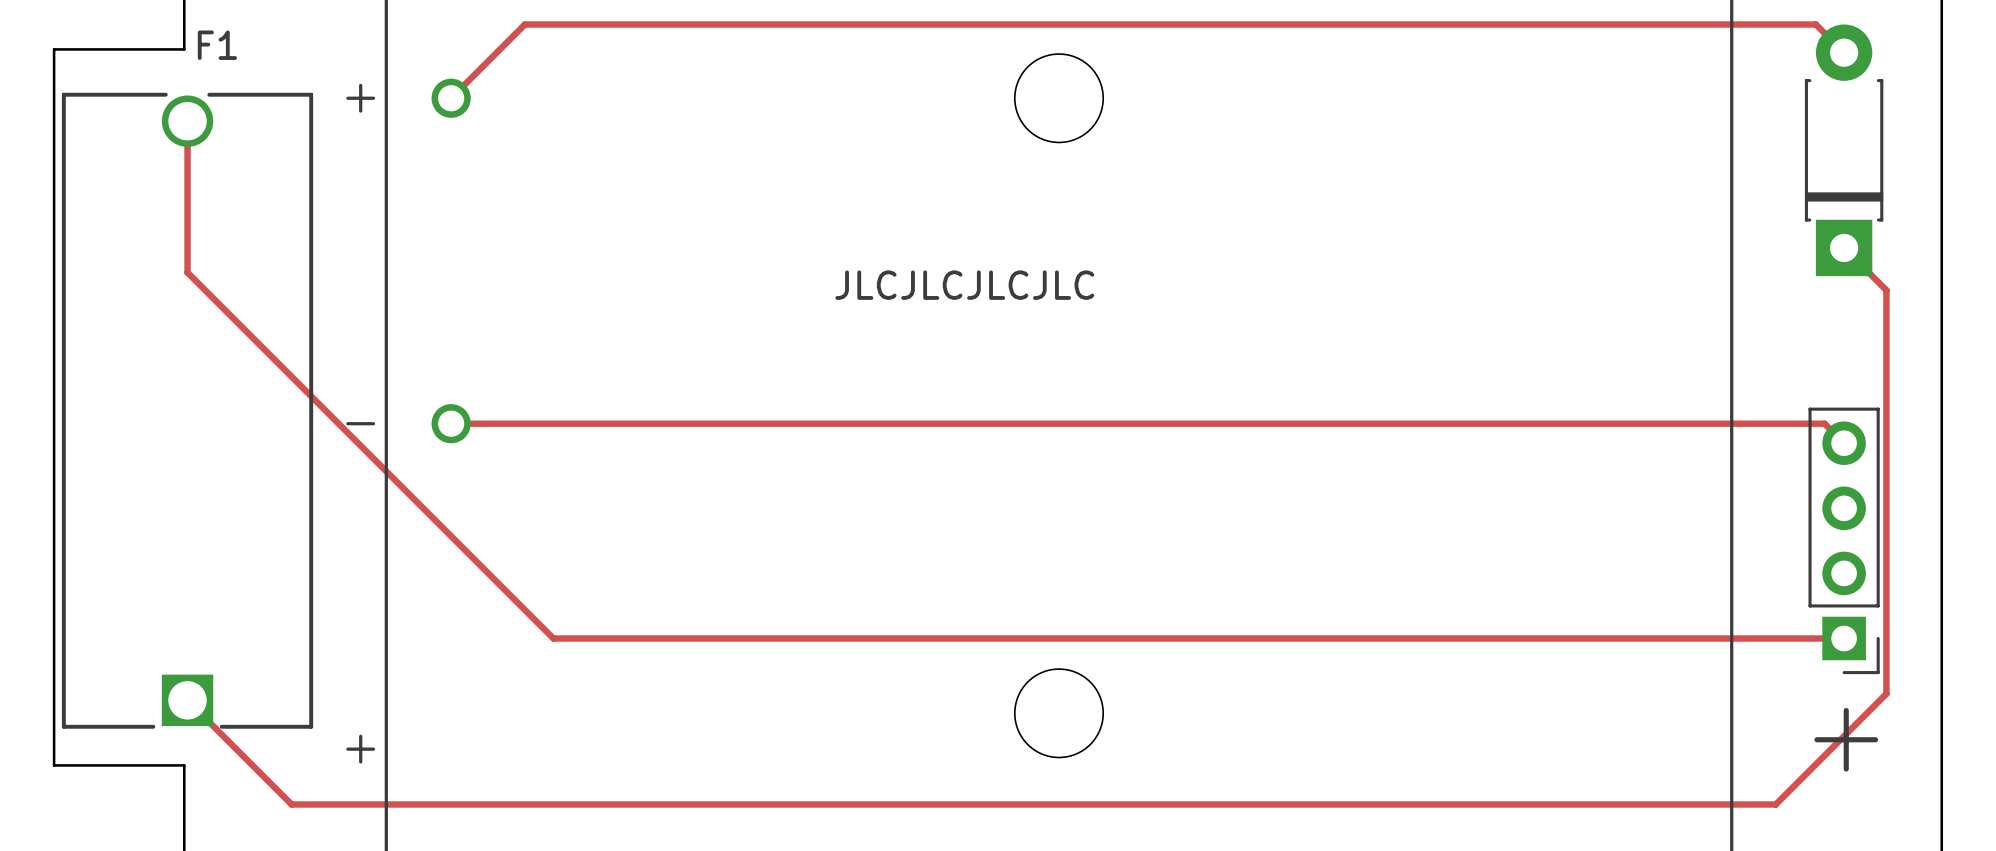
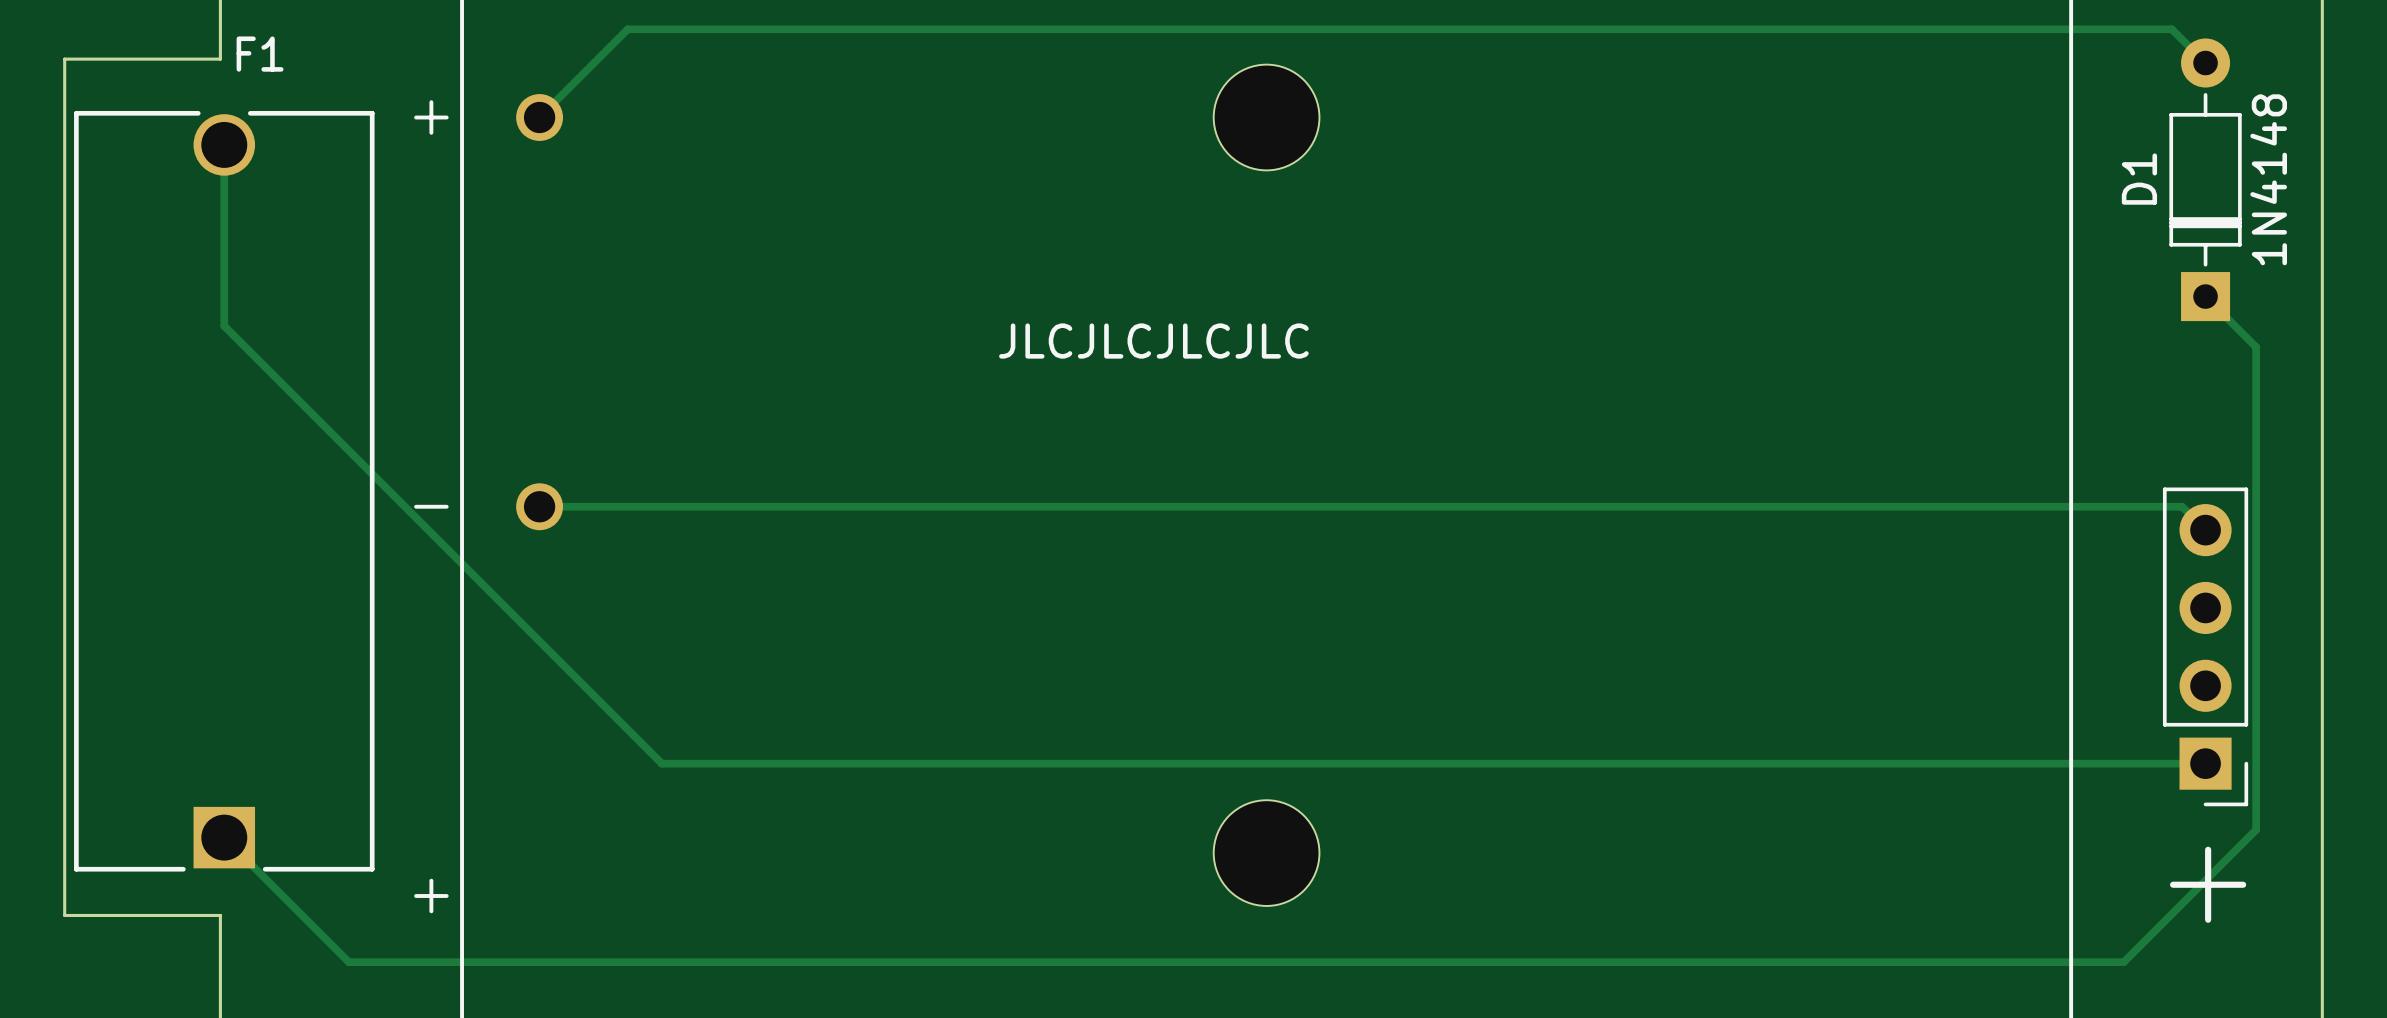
part: (1844, 150) -> none
D1: none -> 1N4148 (2205, 179)

